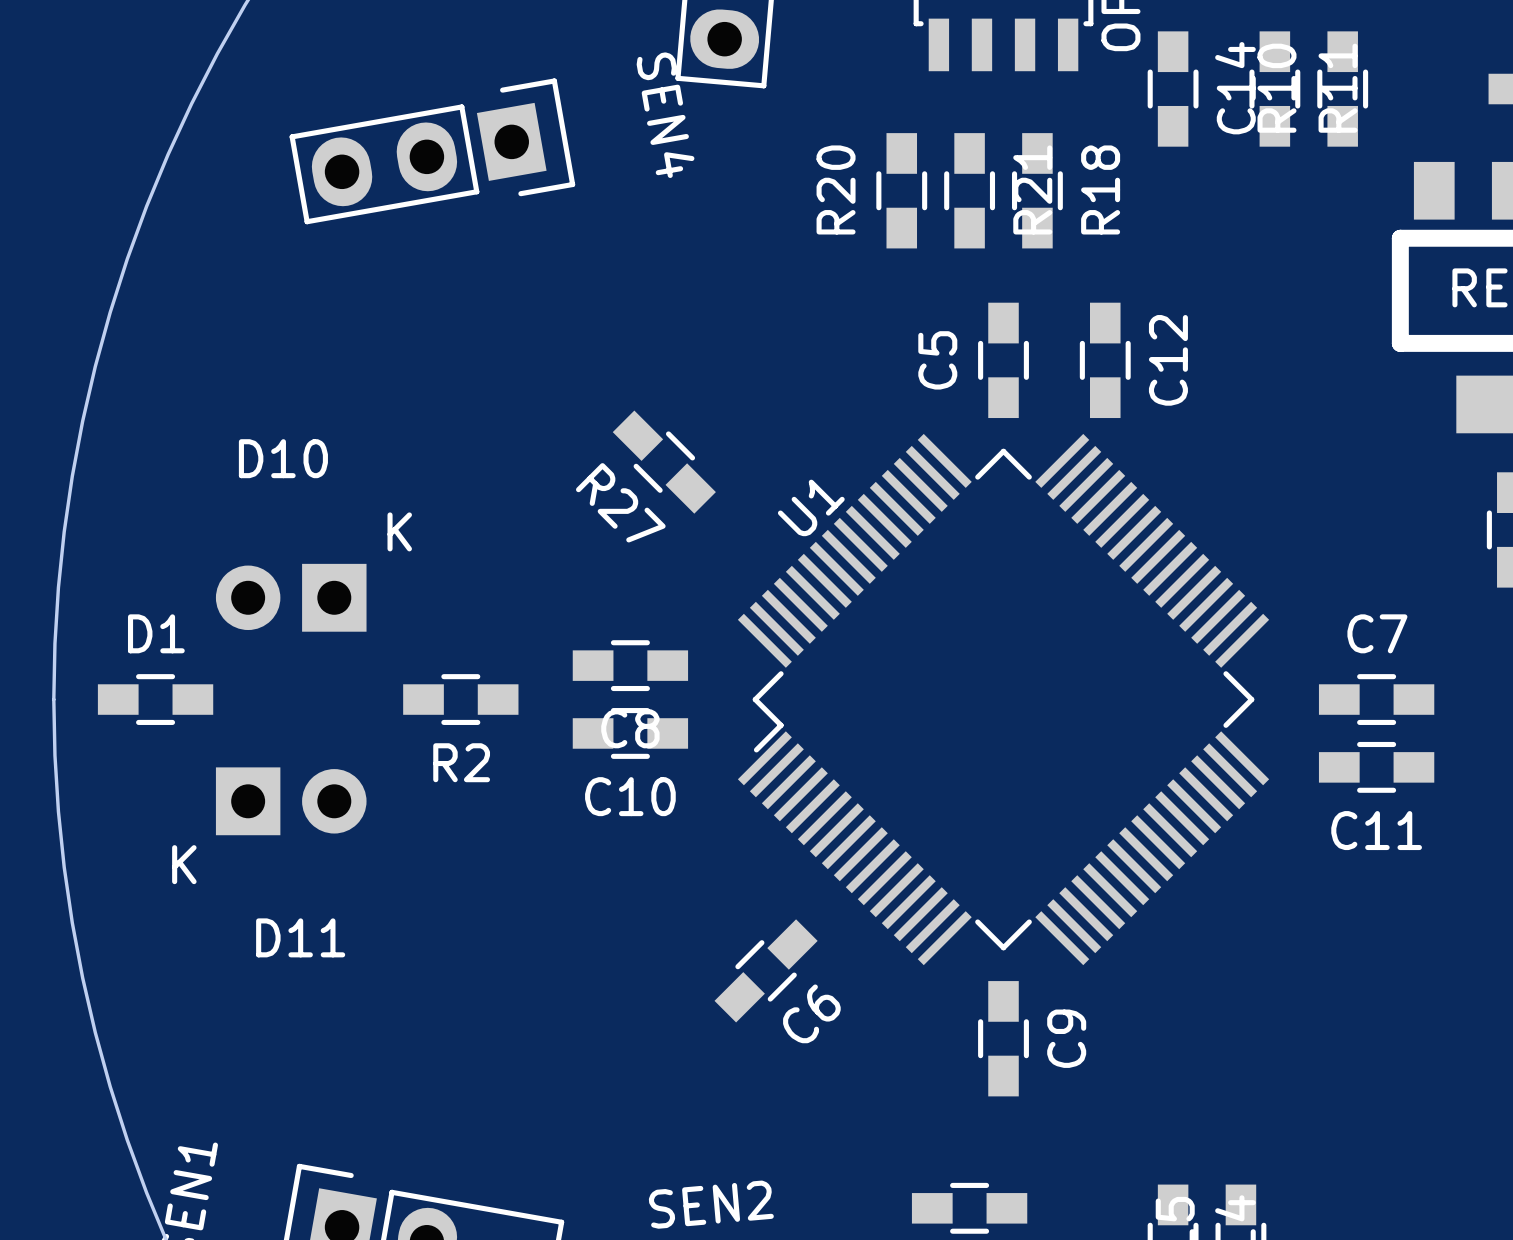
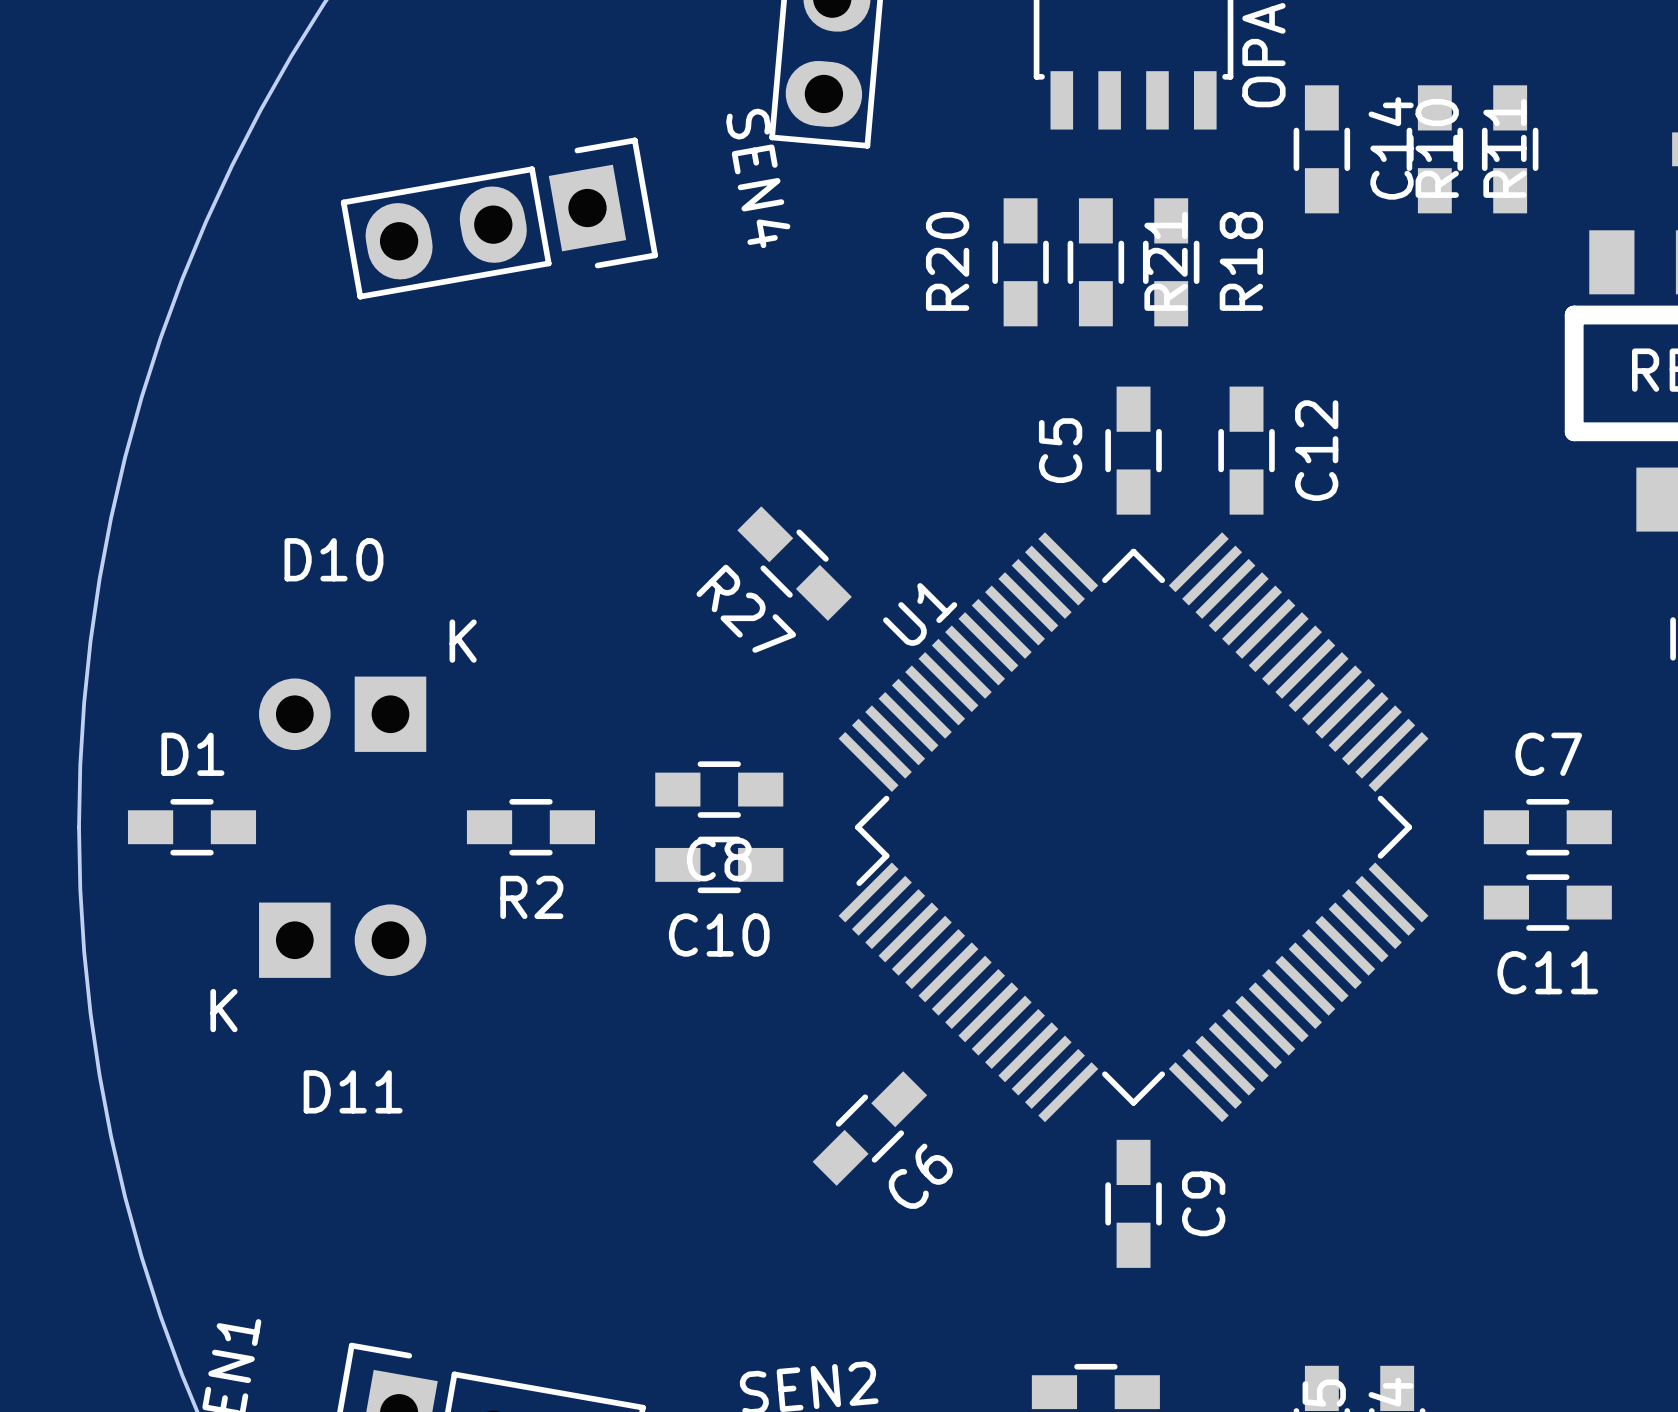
R27 position: (664, 462) -> (794, 563)

